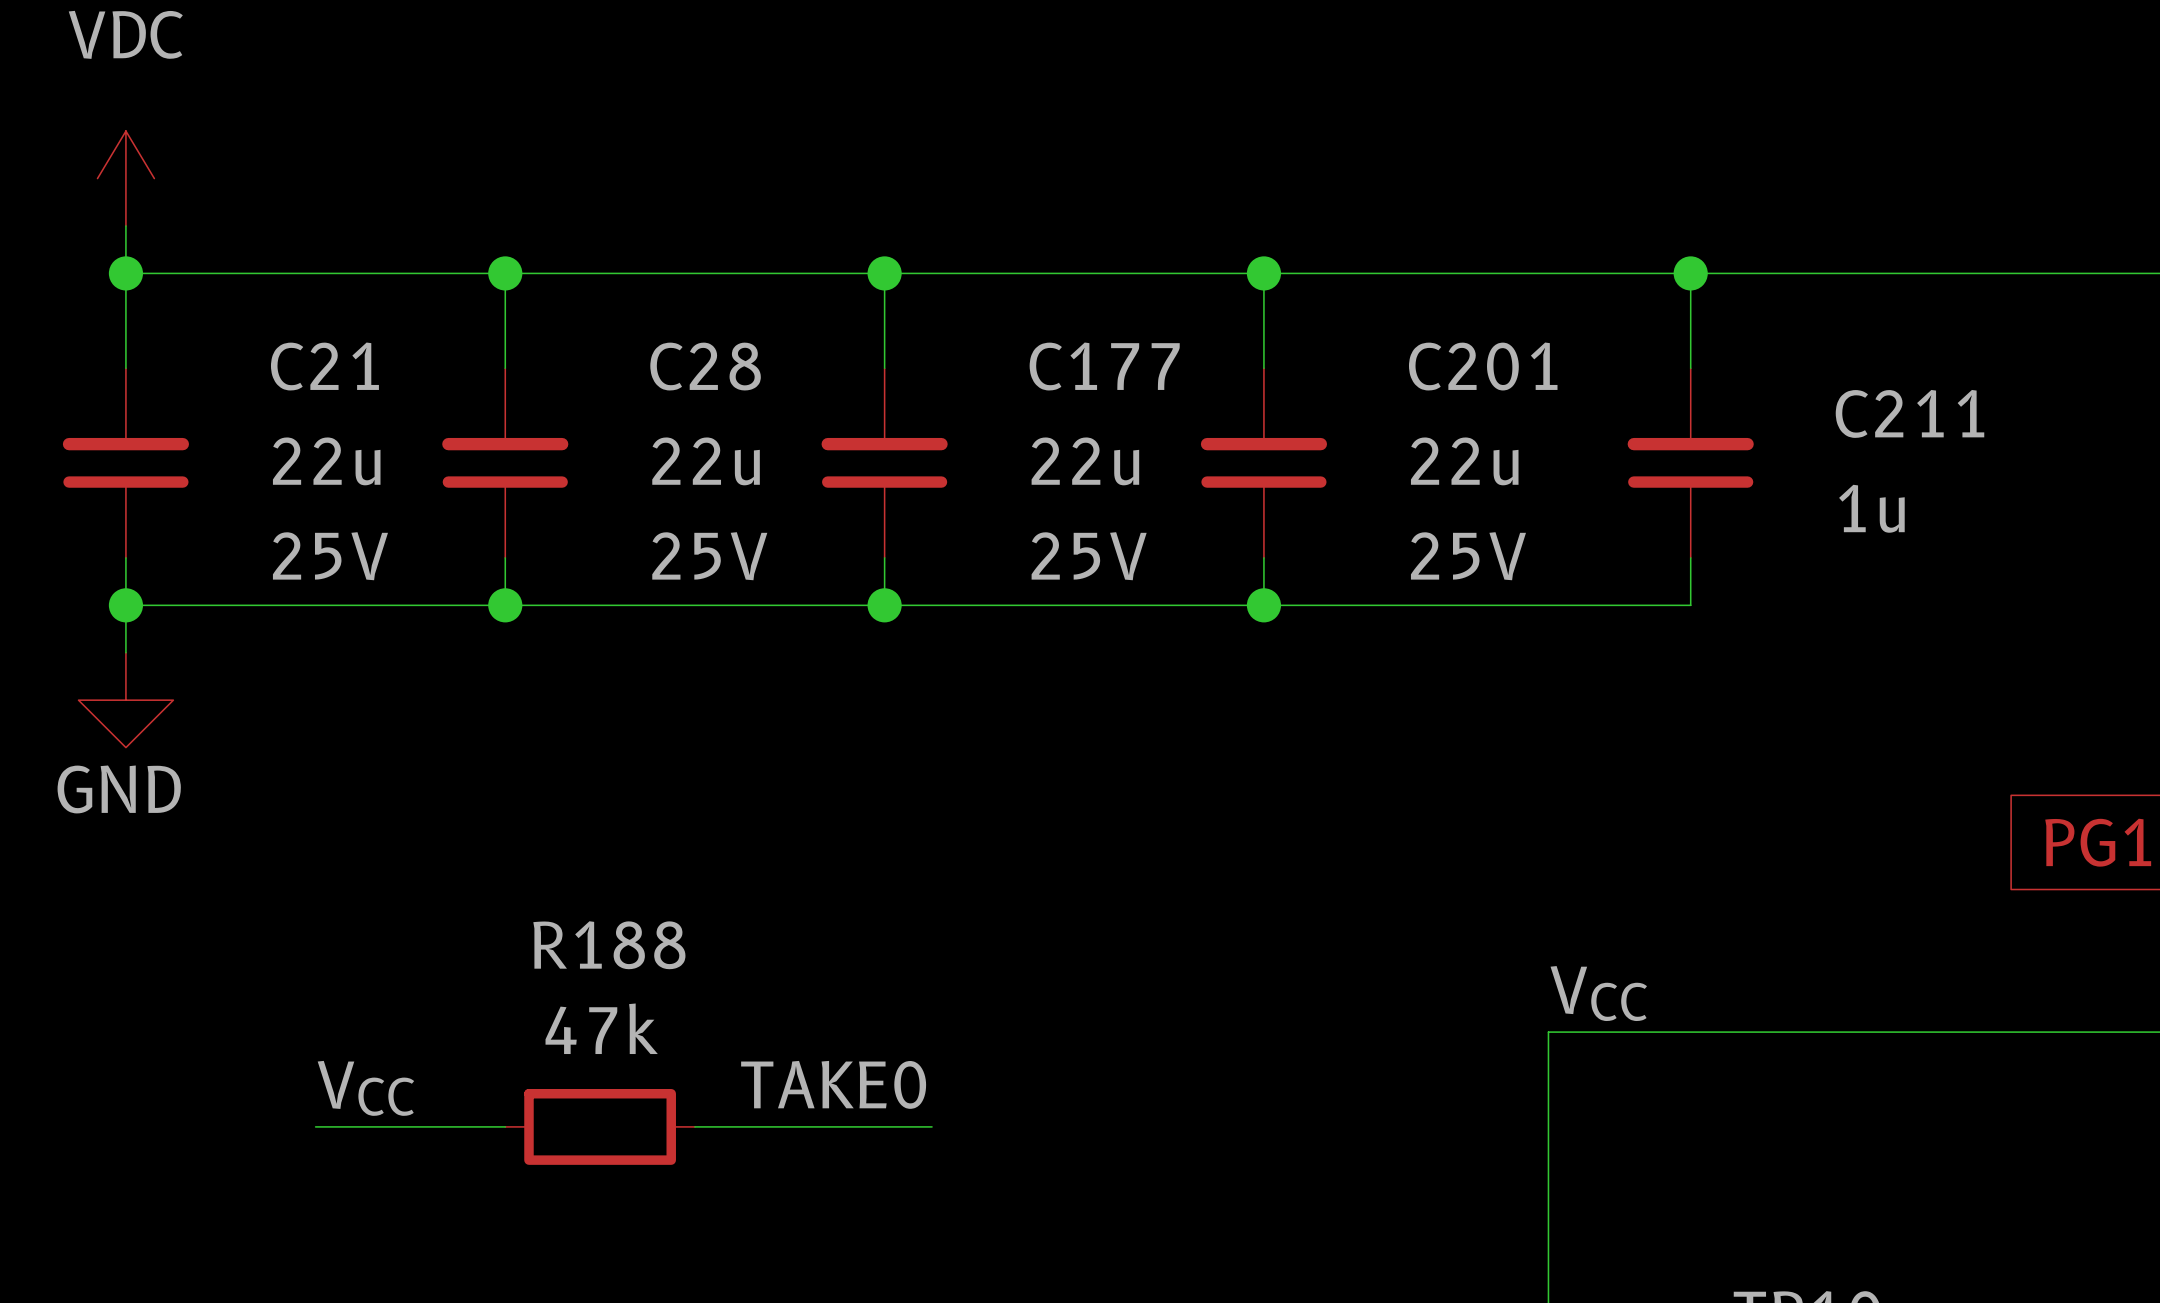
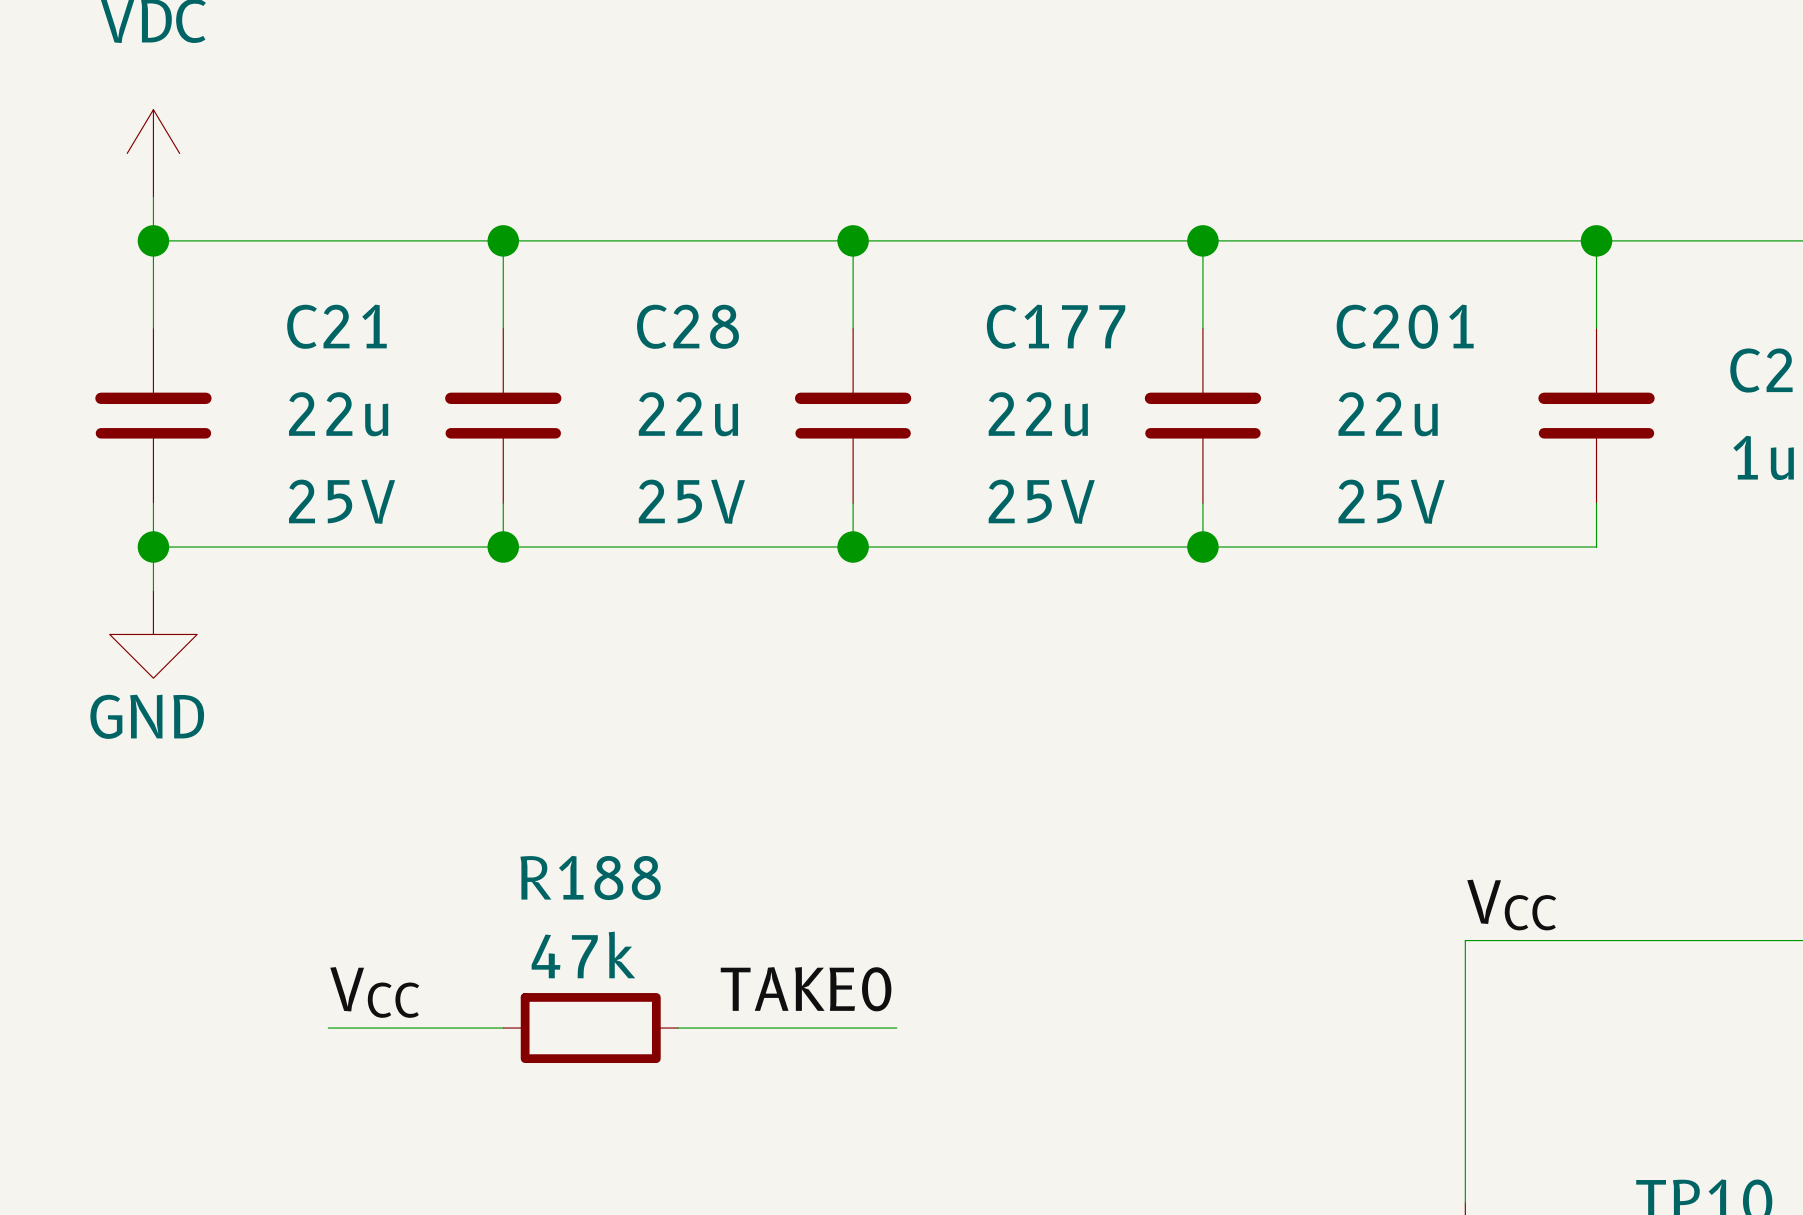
R188 name position: R188 (609, 945) -> R188 (590, 877)
R188 text position: 47k (601, 1028) -> 47k (583, 954)

